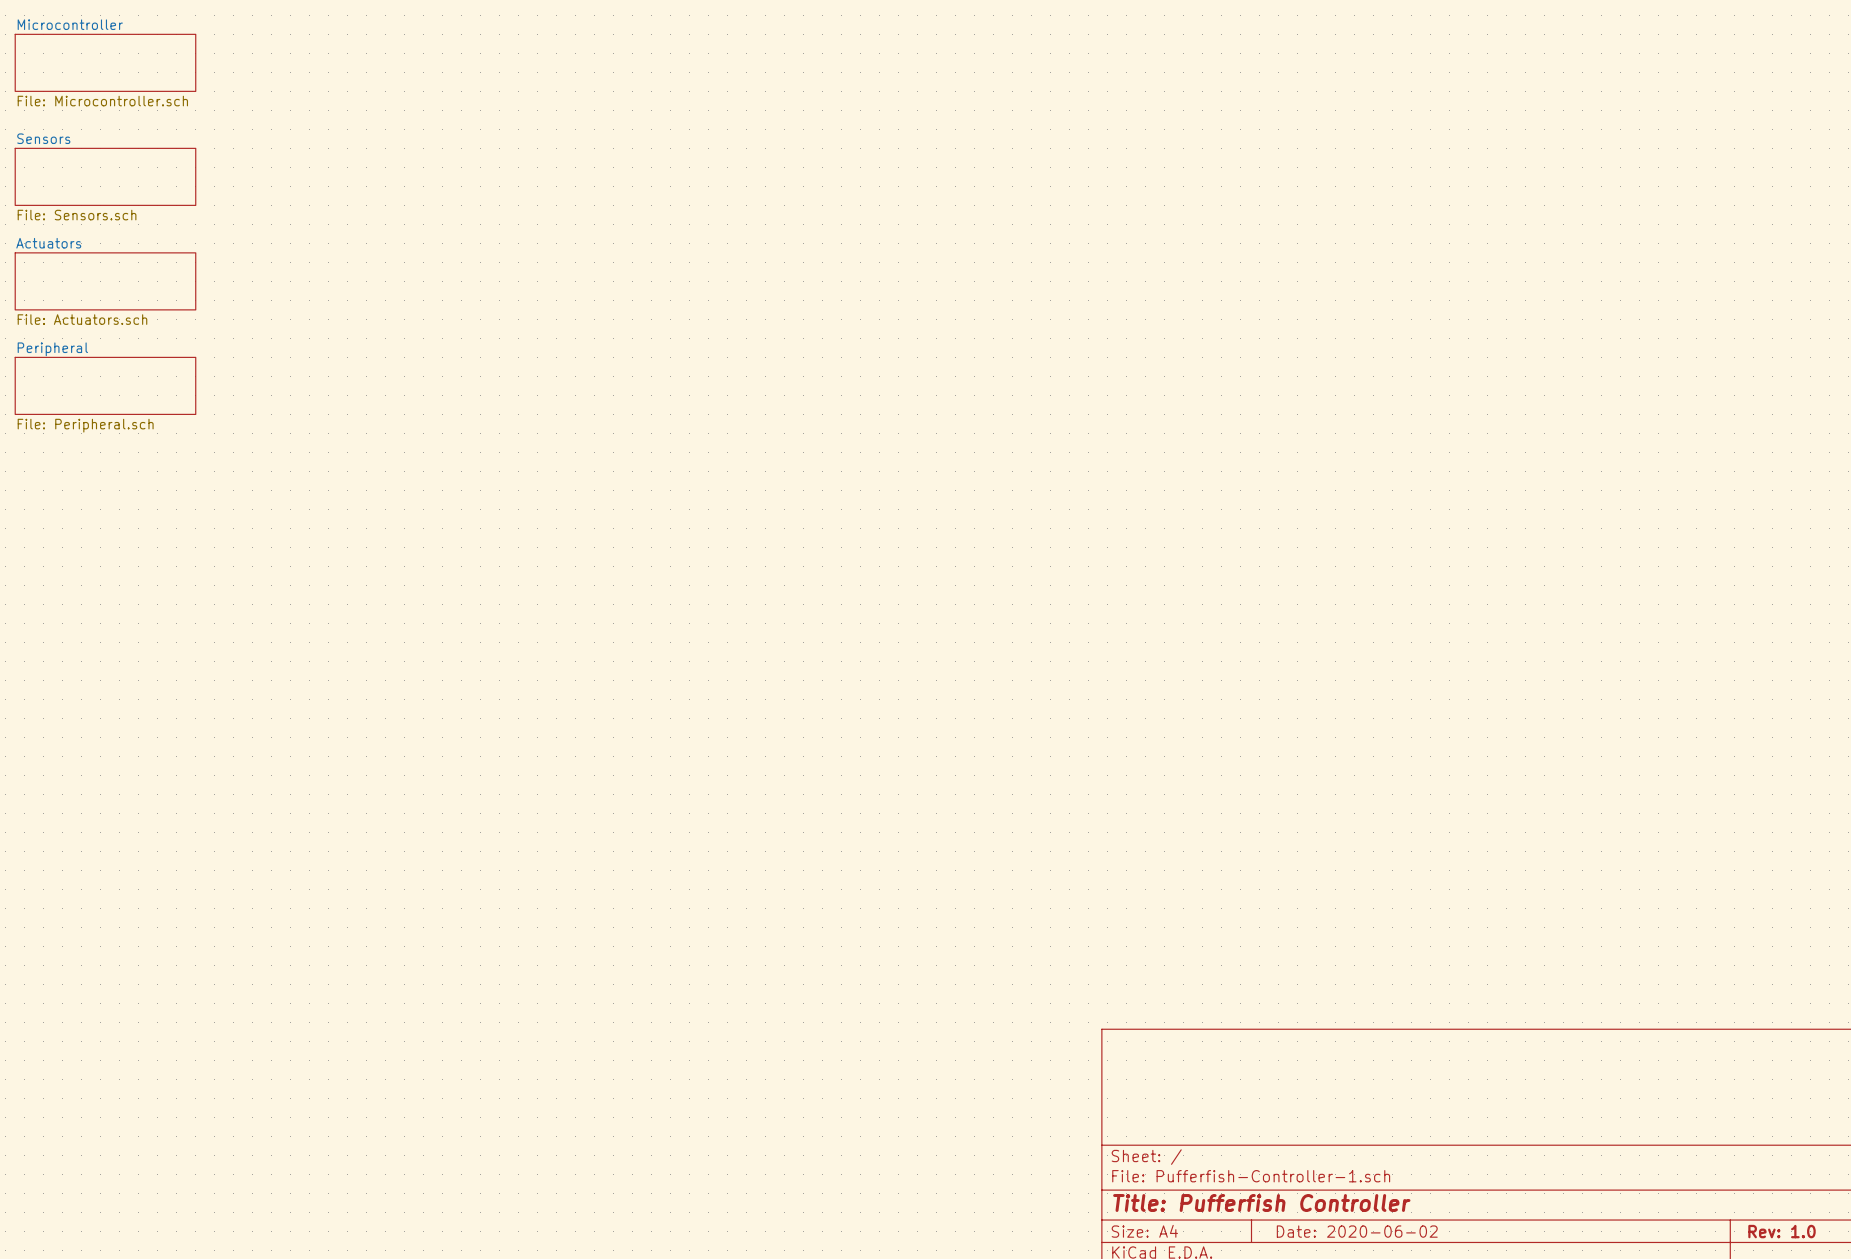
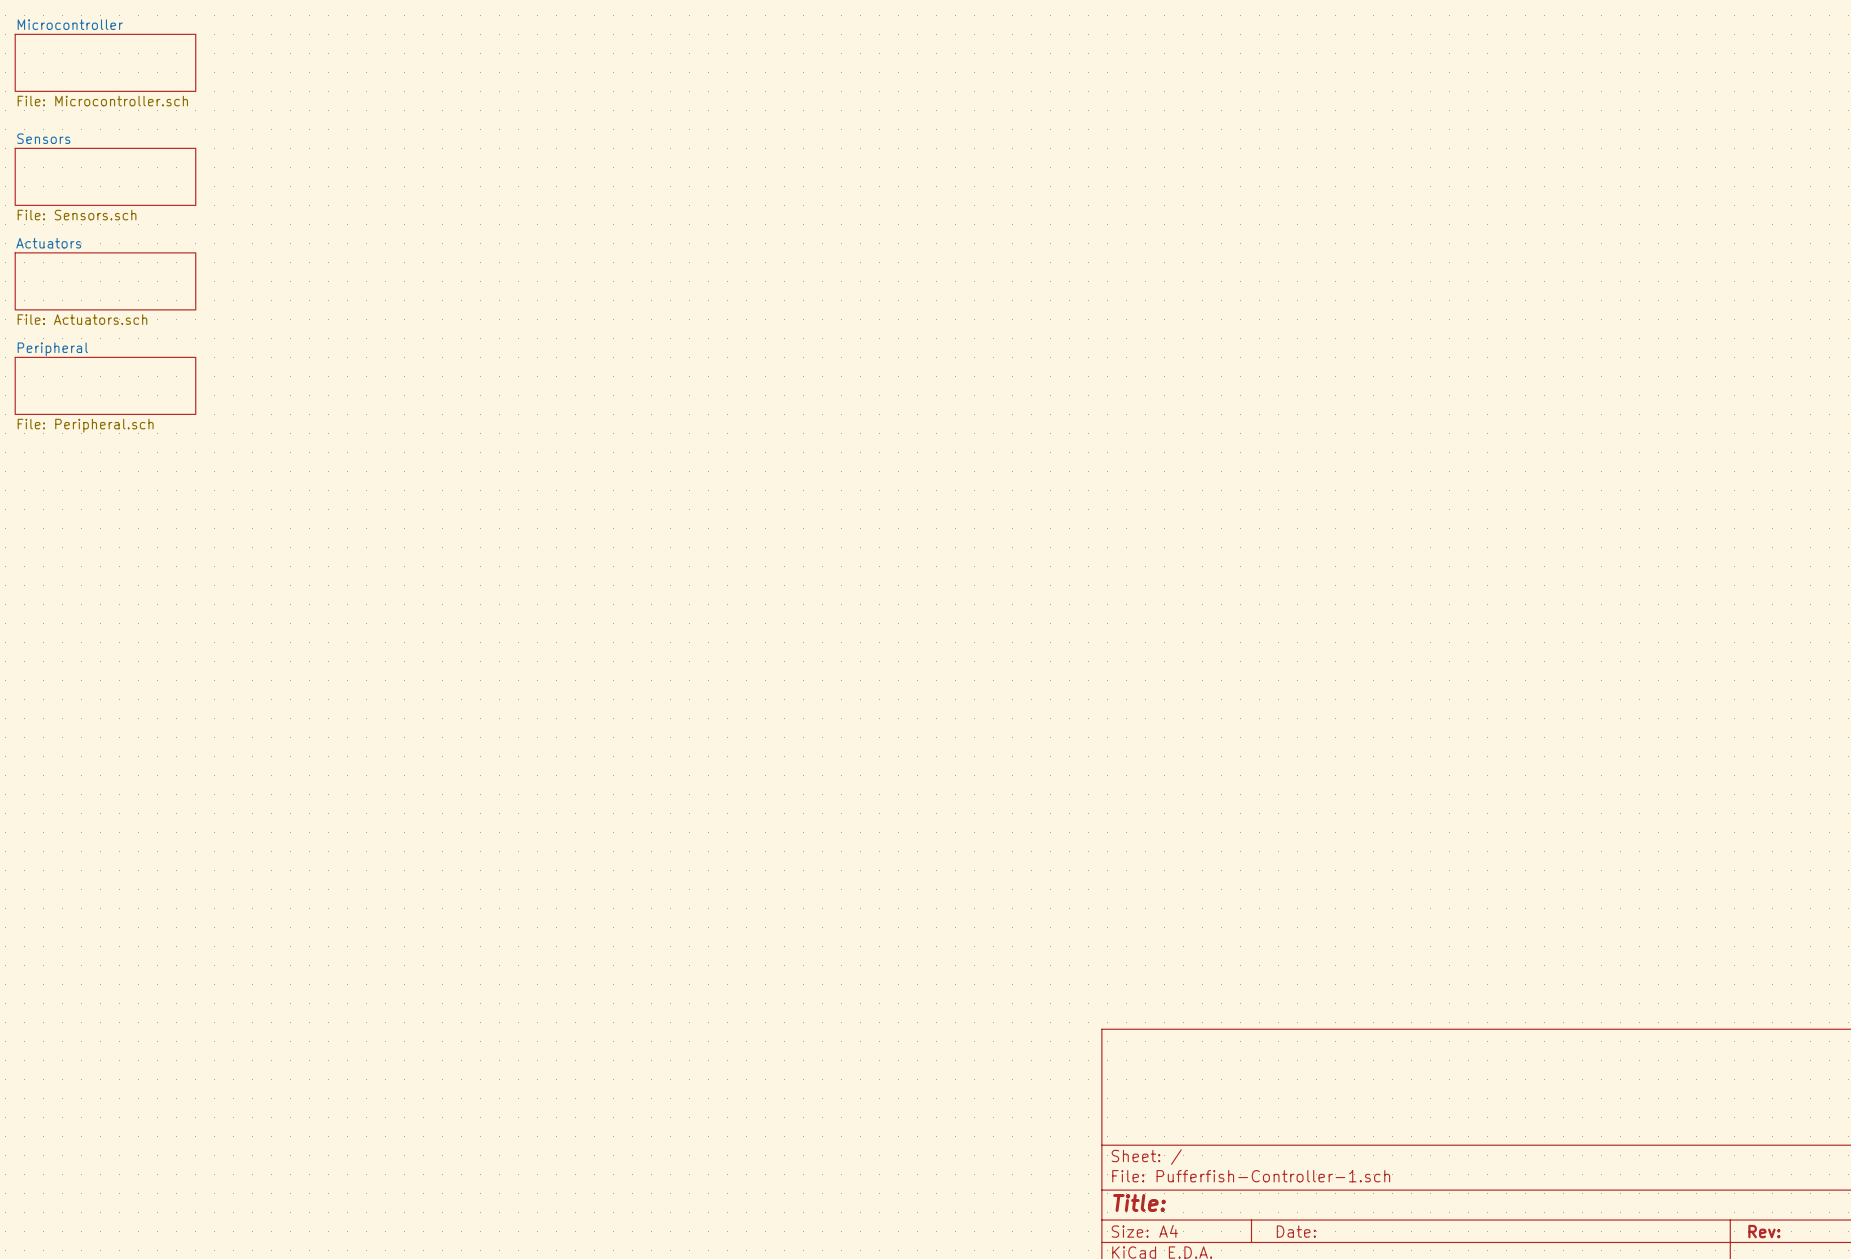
title block: Title: Pufferfish Controller (1261, 1203) -> Title: (1139, 1203)
title block: Date: 2020-06-02 (1357, 1231) -> Date: (1296, 1231)
title block: Rev: 1.0 (1782, 1231) -> Rev: (1764, 1231)

